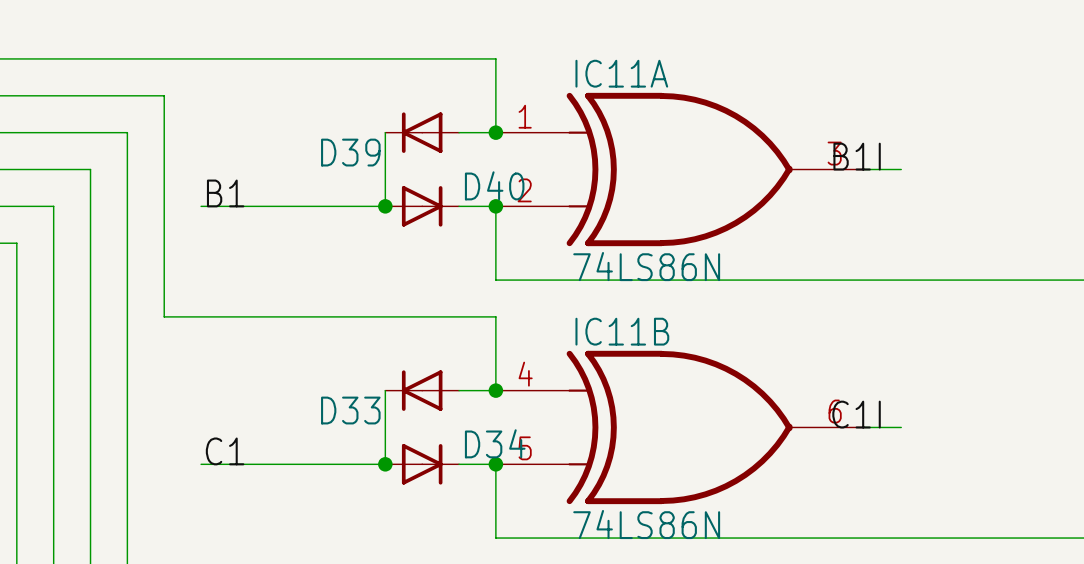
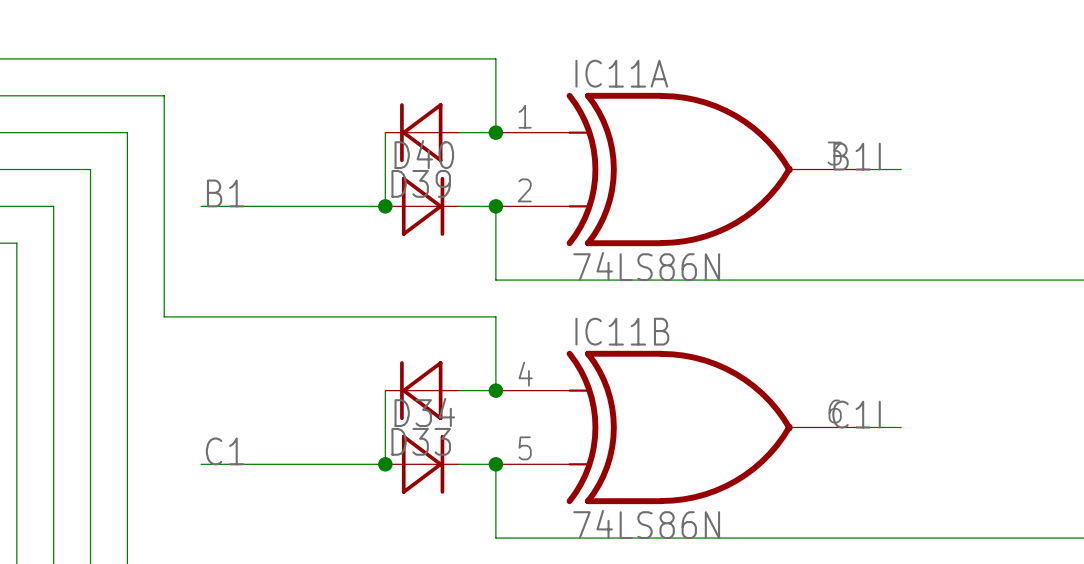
D39 symbol: [385, 112, 460, 153] -> [385, 103, 460, 163]
D39 name position: D39 (350, 152) -> D39 (421, 183)
D40 name position: D40 (494, 185) -> D40 (424, 154)
D40 symbol: [385, 186, 460, 227] -> [385, 176, 460, 236]
D33 symbol: [385, 370, 460, 411] -> [385, 361, 460, 421]
D33 name position: D33 (350, 410) -> D33 (421, 441)
D34 name position: D34 (495, 443) -> D34 (424, 412)
D34 symbol: [385, 444, 460, 485] -> [385, 434, 460, 494]

